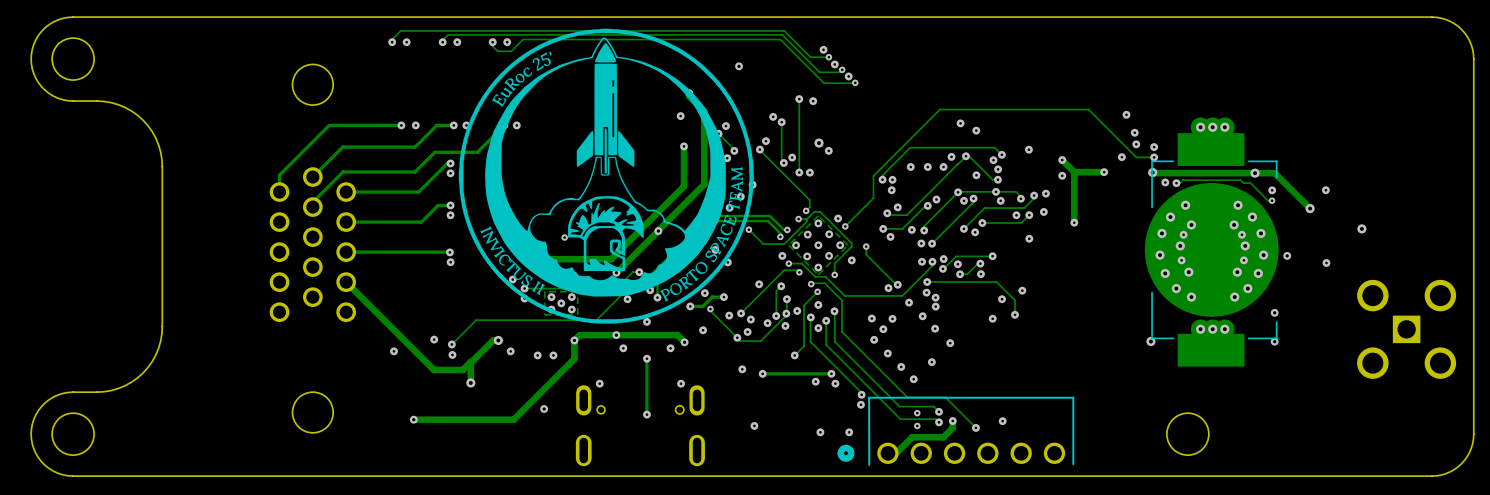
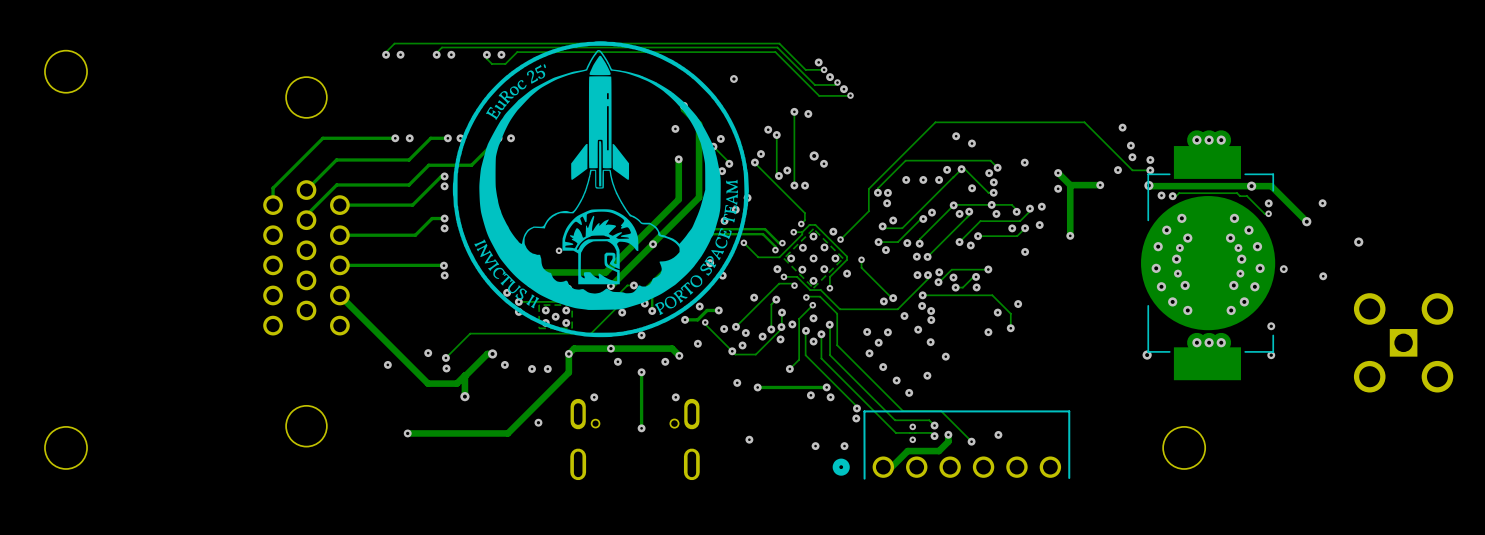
board edge: (1431, 17) (63, 18) (45, 27) (33, 44) (31, 64) (38, 82) (49, 93) (63, 99) (104, 101) (125, 107) (137, 115) (147, 125) (158, 144) (162, 166) (161, 333) (158, 348) (152, 361) (143, 372) (131, 382) (118, 388) (104, 391) (63, 393) (45, 402) (33, 419) (31, 429) (32, 444) (35, 453) (45, 465) (58, 473) (73, 476) (1431, 476) (1445, 473) (1457, 466) (1464, 460) (1469, 452) (1473, 438) (1473, 59) (1469, 40) (1461, 29) (1450, 21) (1431, 17) -> none

